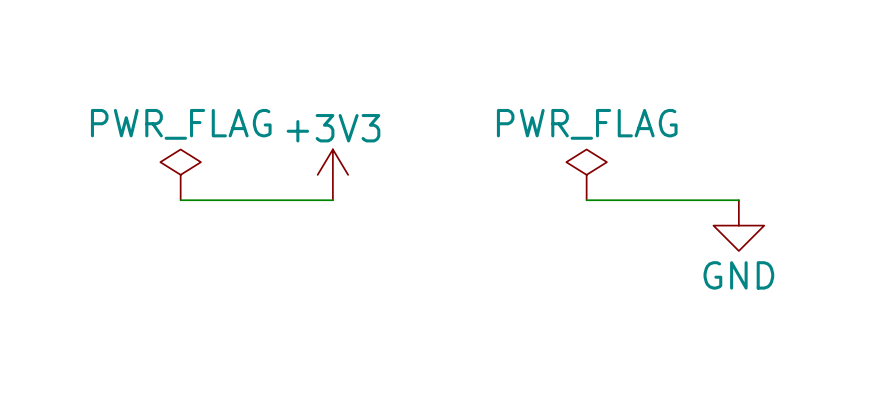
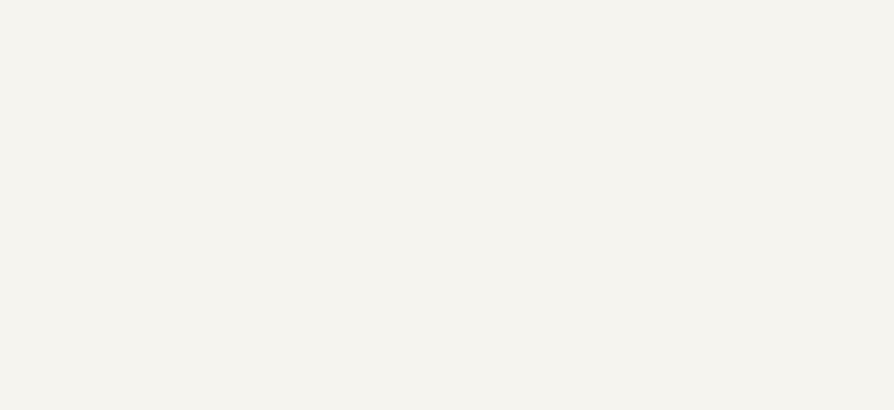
power symbol: PWR_FLAG (180, 174) -> none
power symbol: +3V3 (332, 174) -> none
power symbol: PWR_FLAG (586, 174) -> none
wire: (180, 200) (332, 200) -> none
wire: (586, 200) (738, 200) -> none
power symbol: GND (738, 225) -> none

